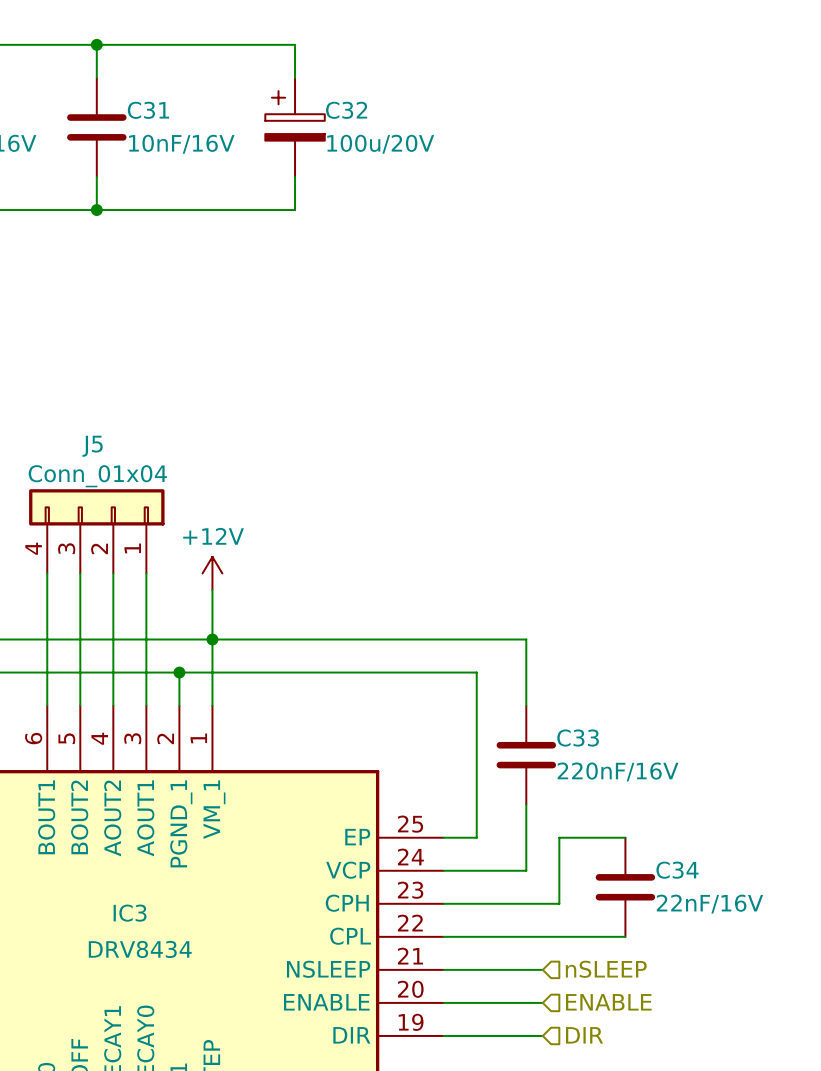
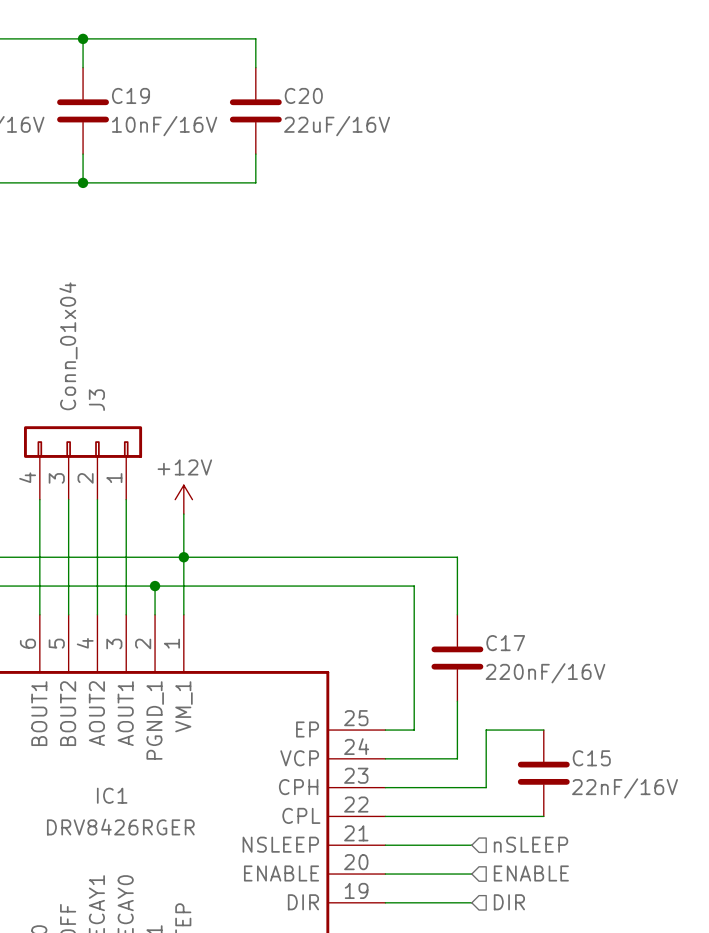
C31 name: C31 (148, 110) -> C19 (131, 95)
C32: 100u/20V (295, 127) -> none
C20: none -> 22uF/16V (255, 110)
J5 name: J5 (92, 446) -> J3 (96, 400)
J5 value rotation: 0° (97, 476) -> 90° counterclockwise (68, 346)
C33 name: C33 (578, 738) -> C17 (505, 643)
C34 name: C34 (677, 870) -> C15 (591, 758)
IC3 name: IC3 (130, 913) -> IC1 (112, 795)
IC3 value: DRV8434 (140, 949) -> DRV8426RGER (120, 827)

